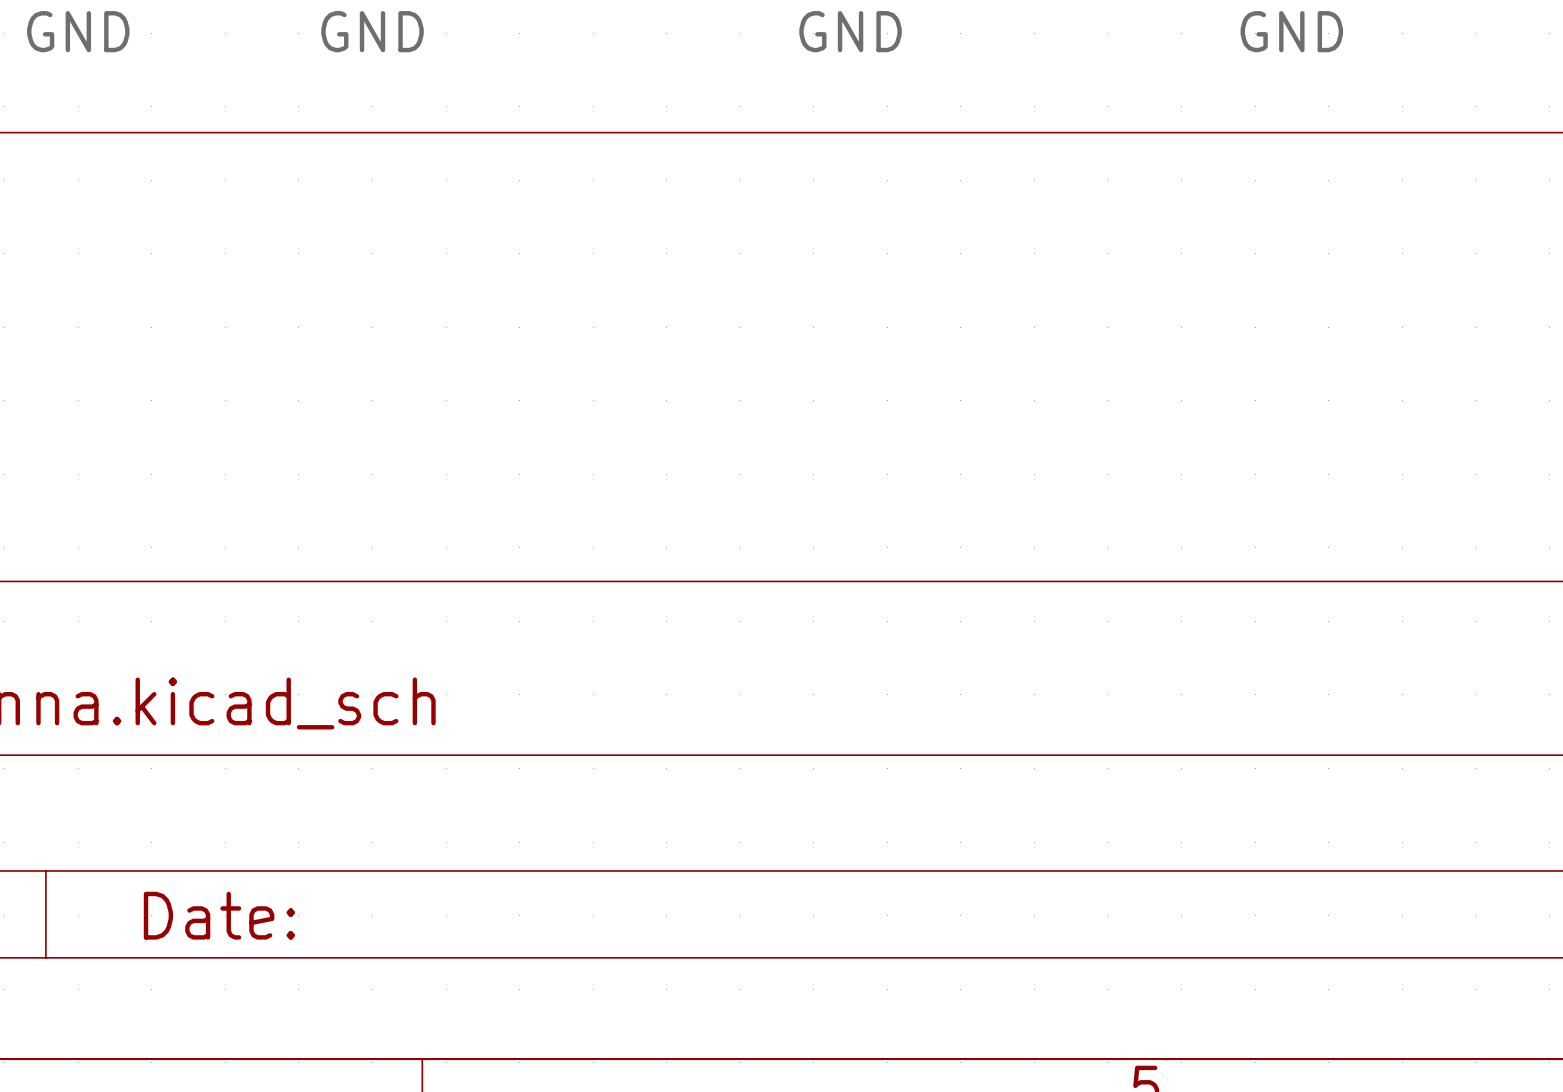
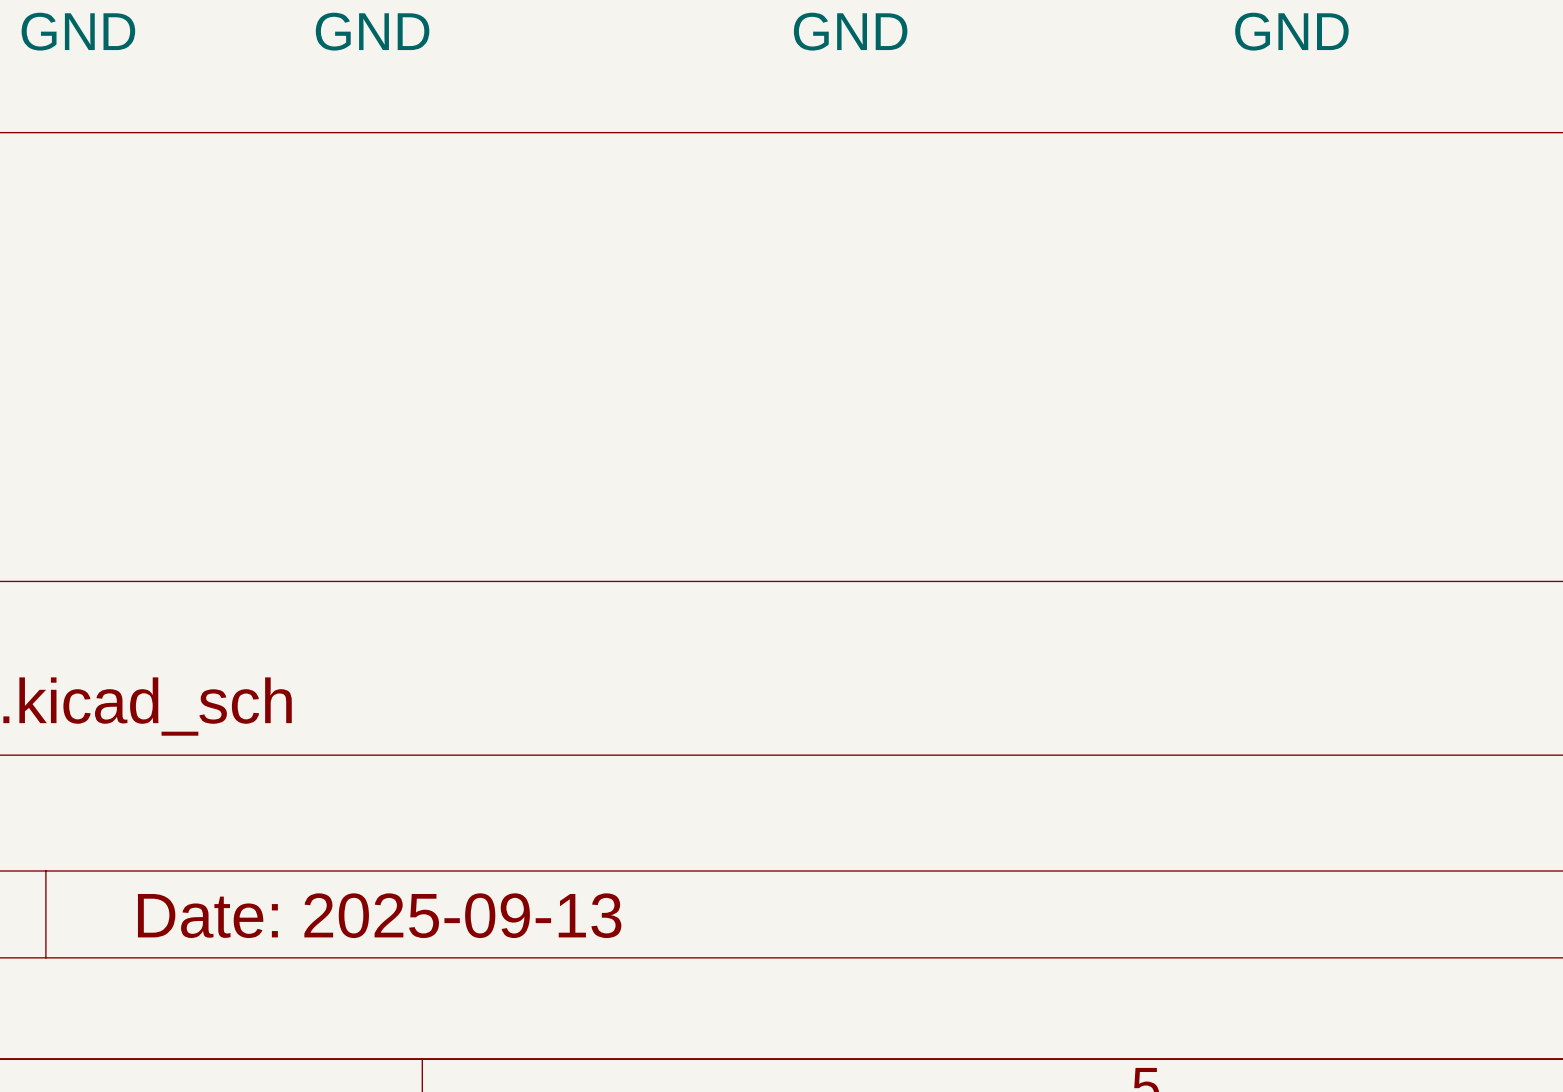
title block: Date: (219, 915) -> Date: 2025-09-13 (379, 915)

